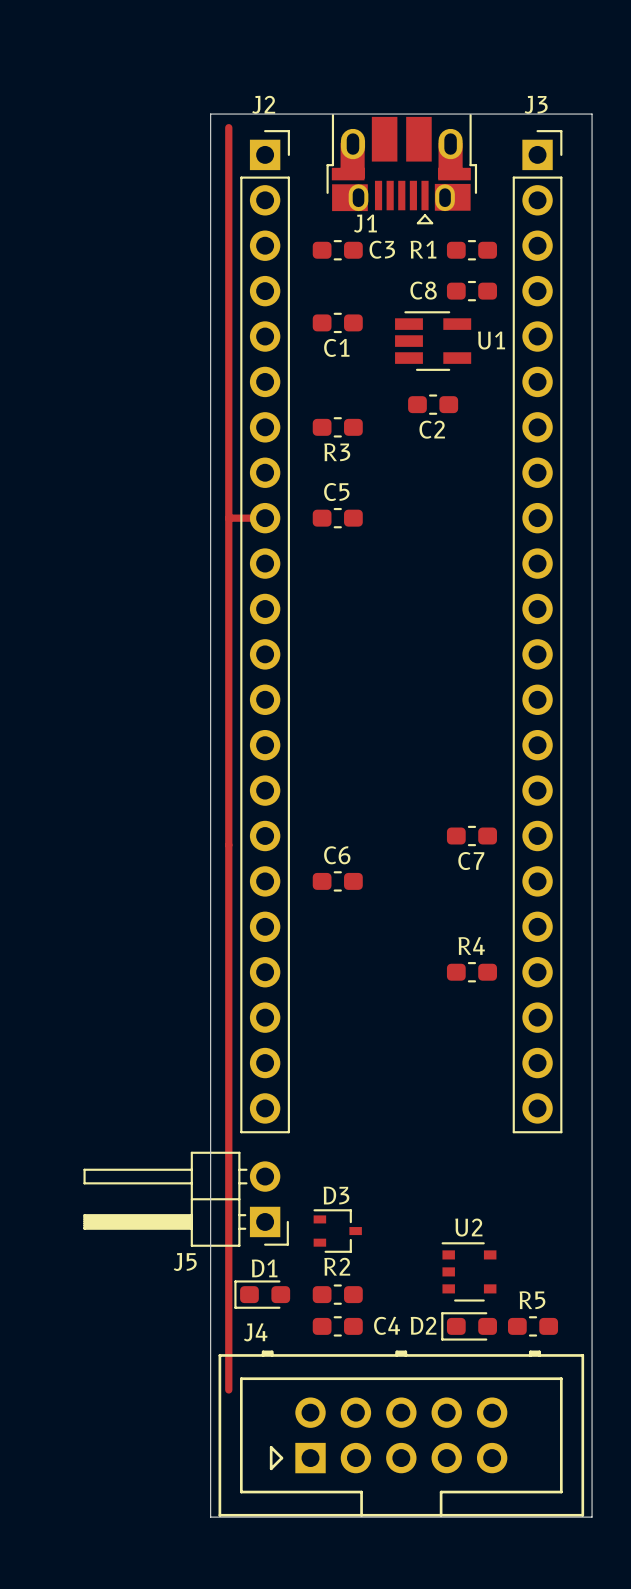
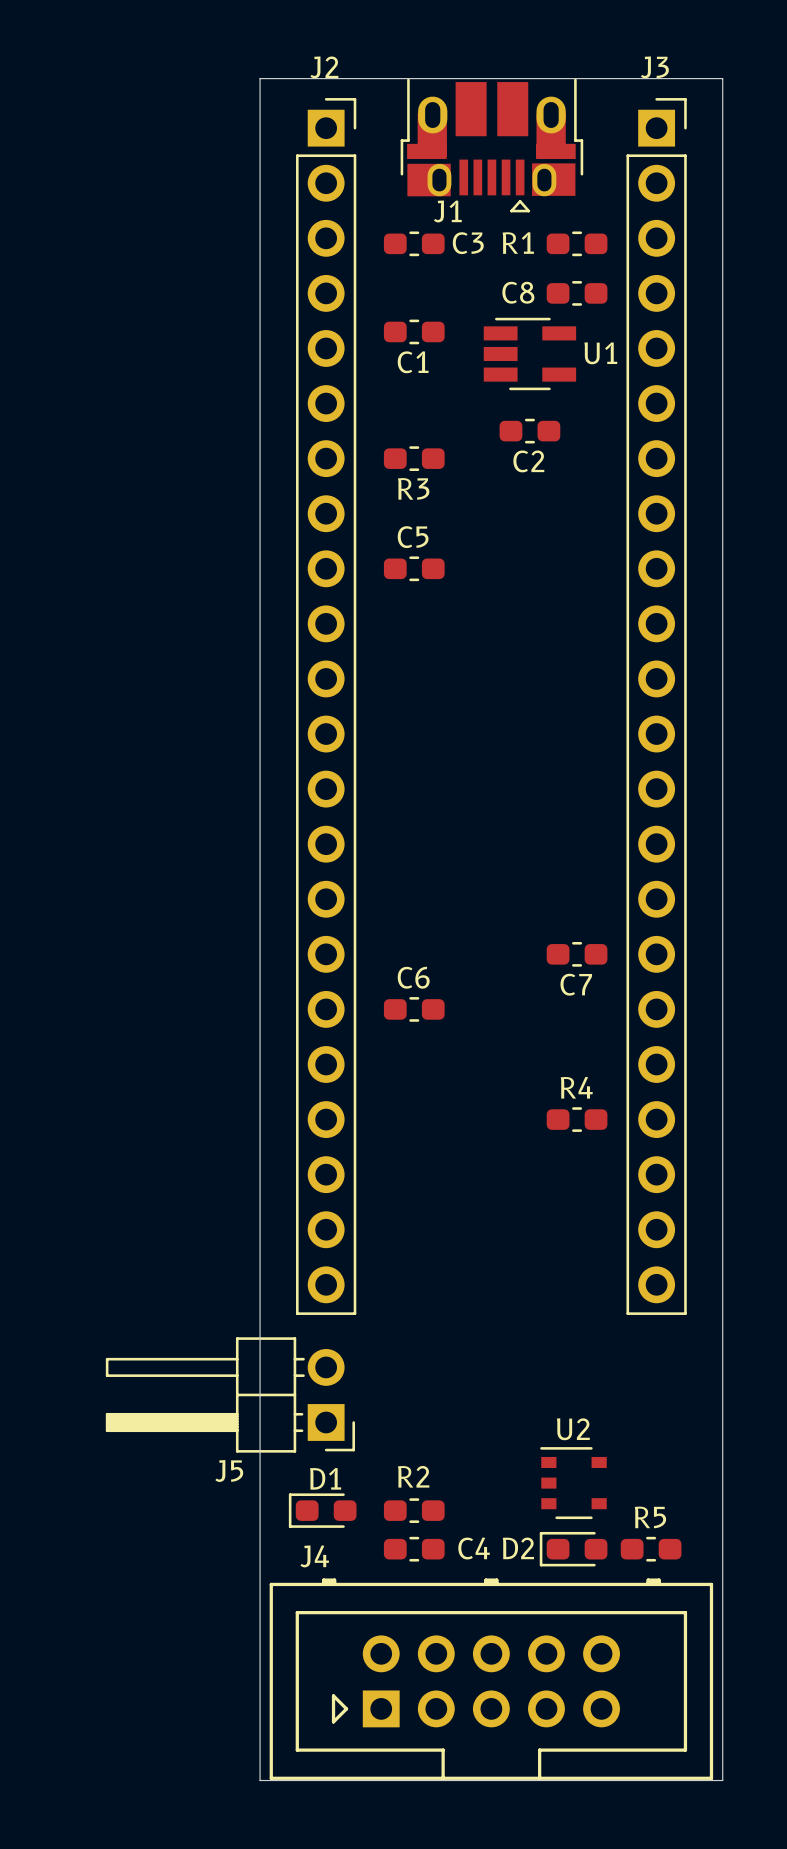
track: (228, 127) (228, 1389) -> none
track: (228, 518) (265, 518) -> none
D3: (337, 1231) -> none

